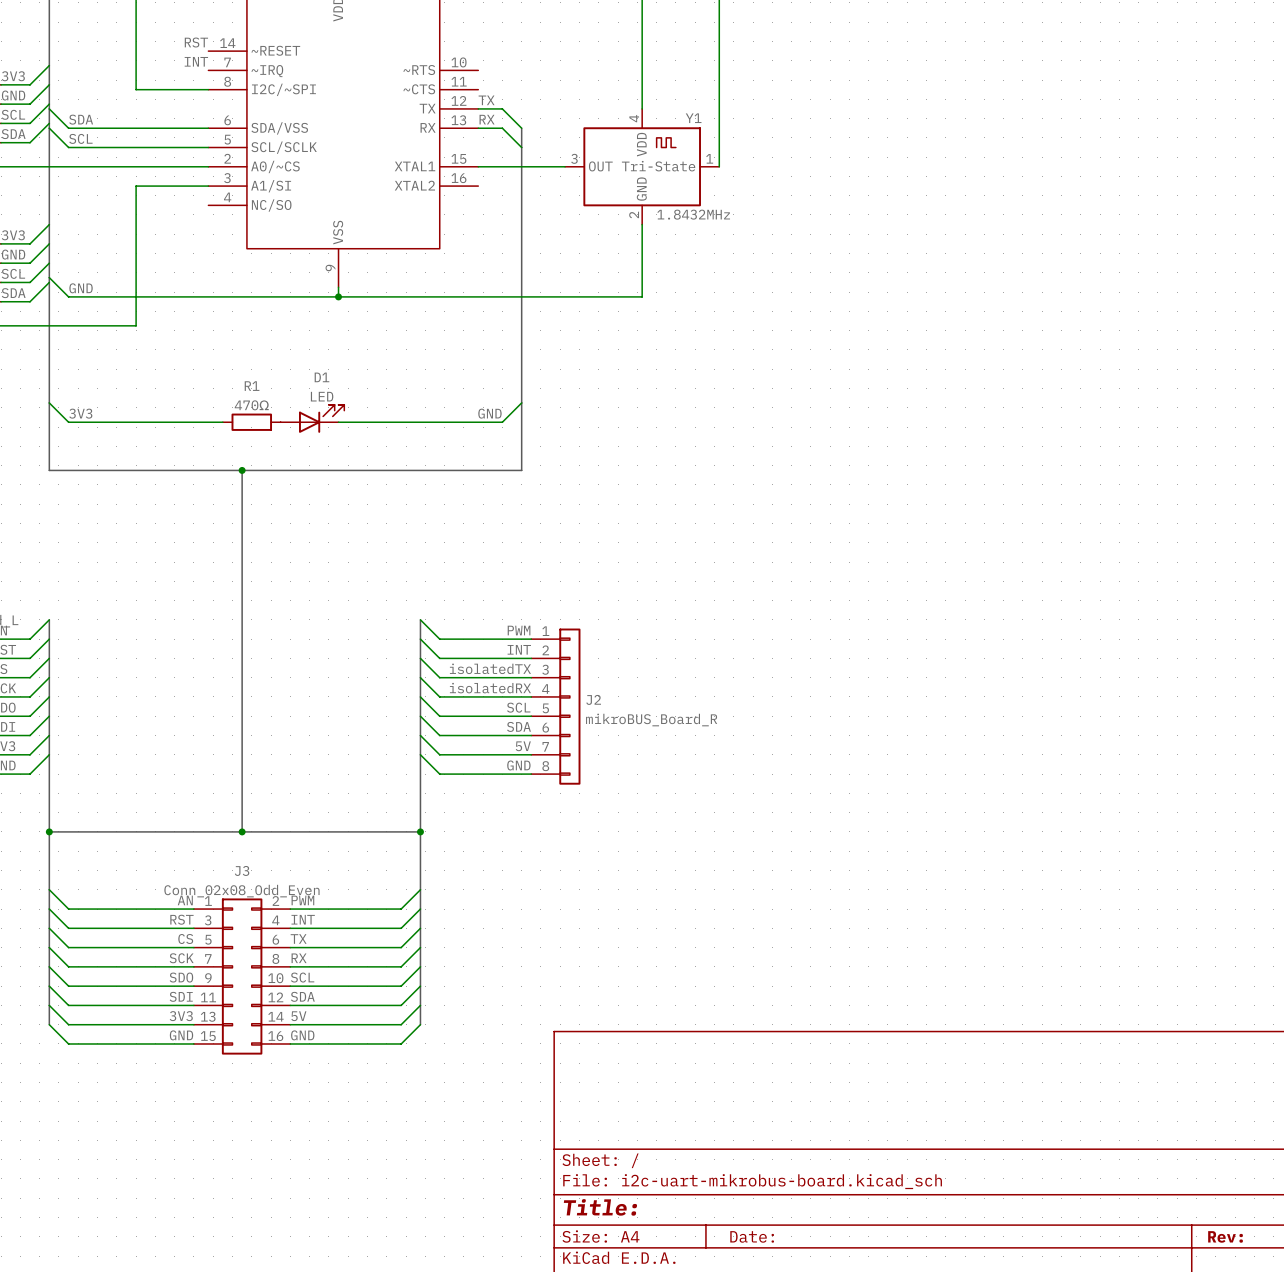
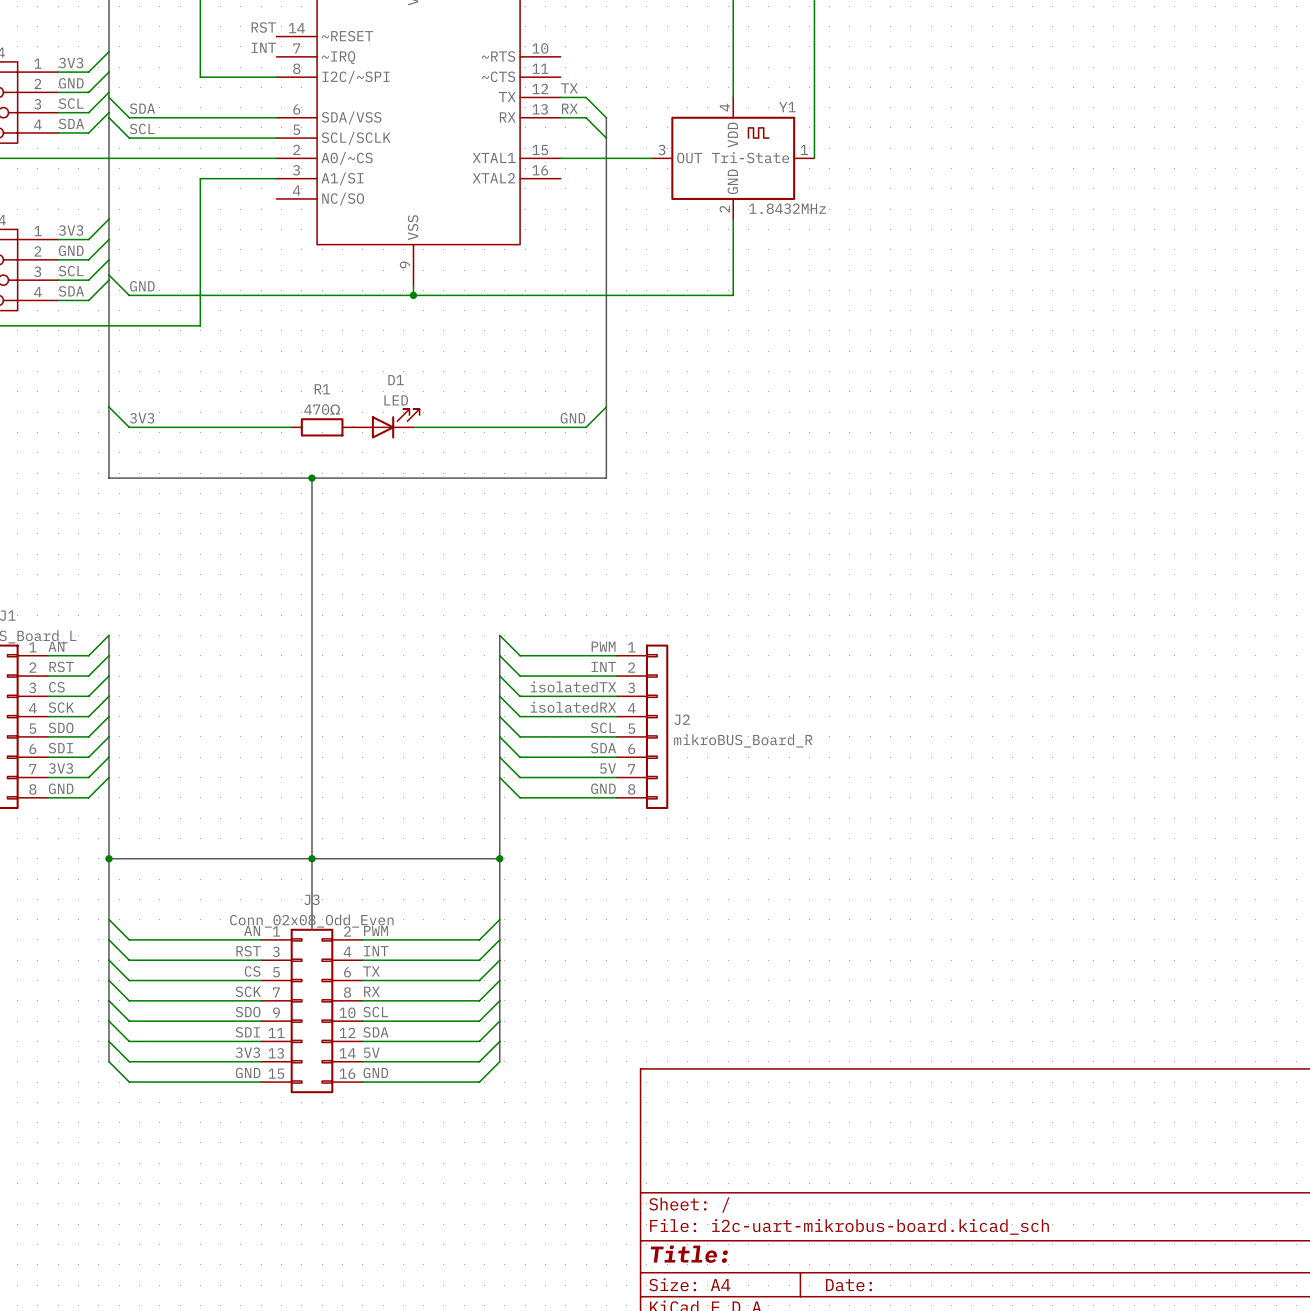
bus: none -> (311, 858) (311, 929)

